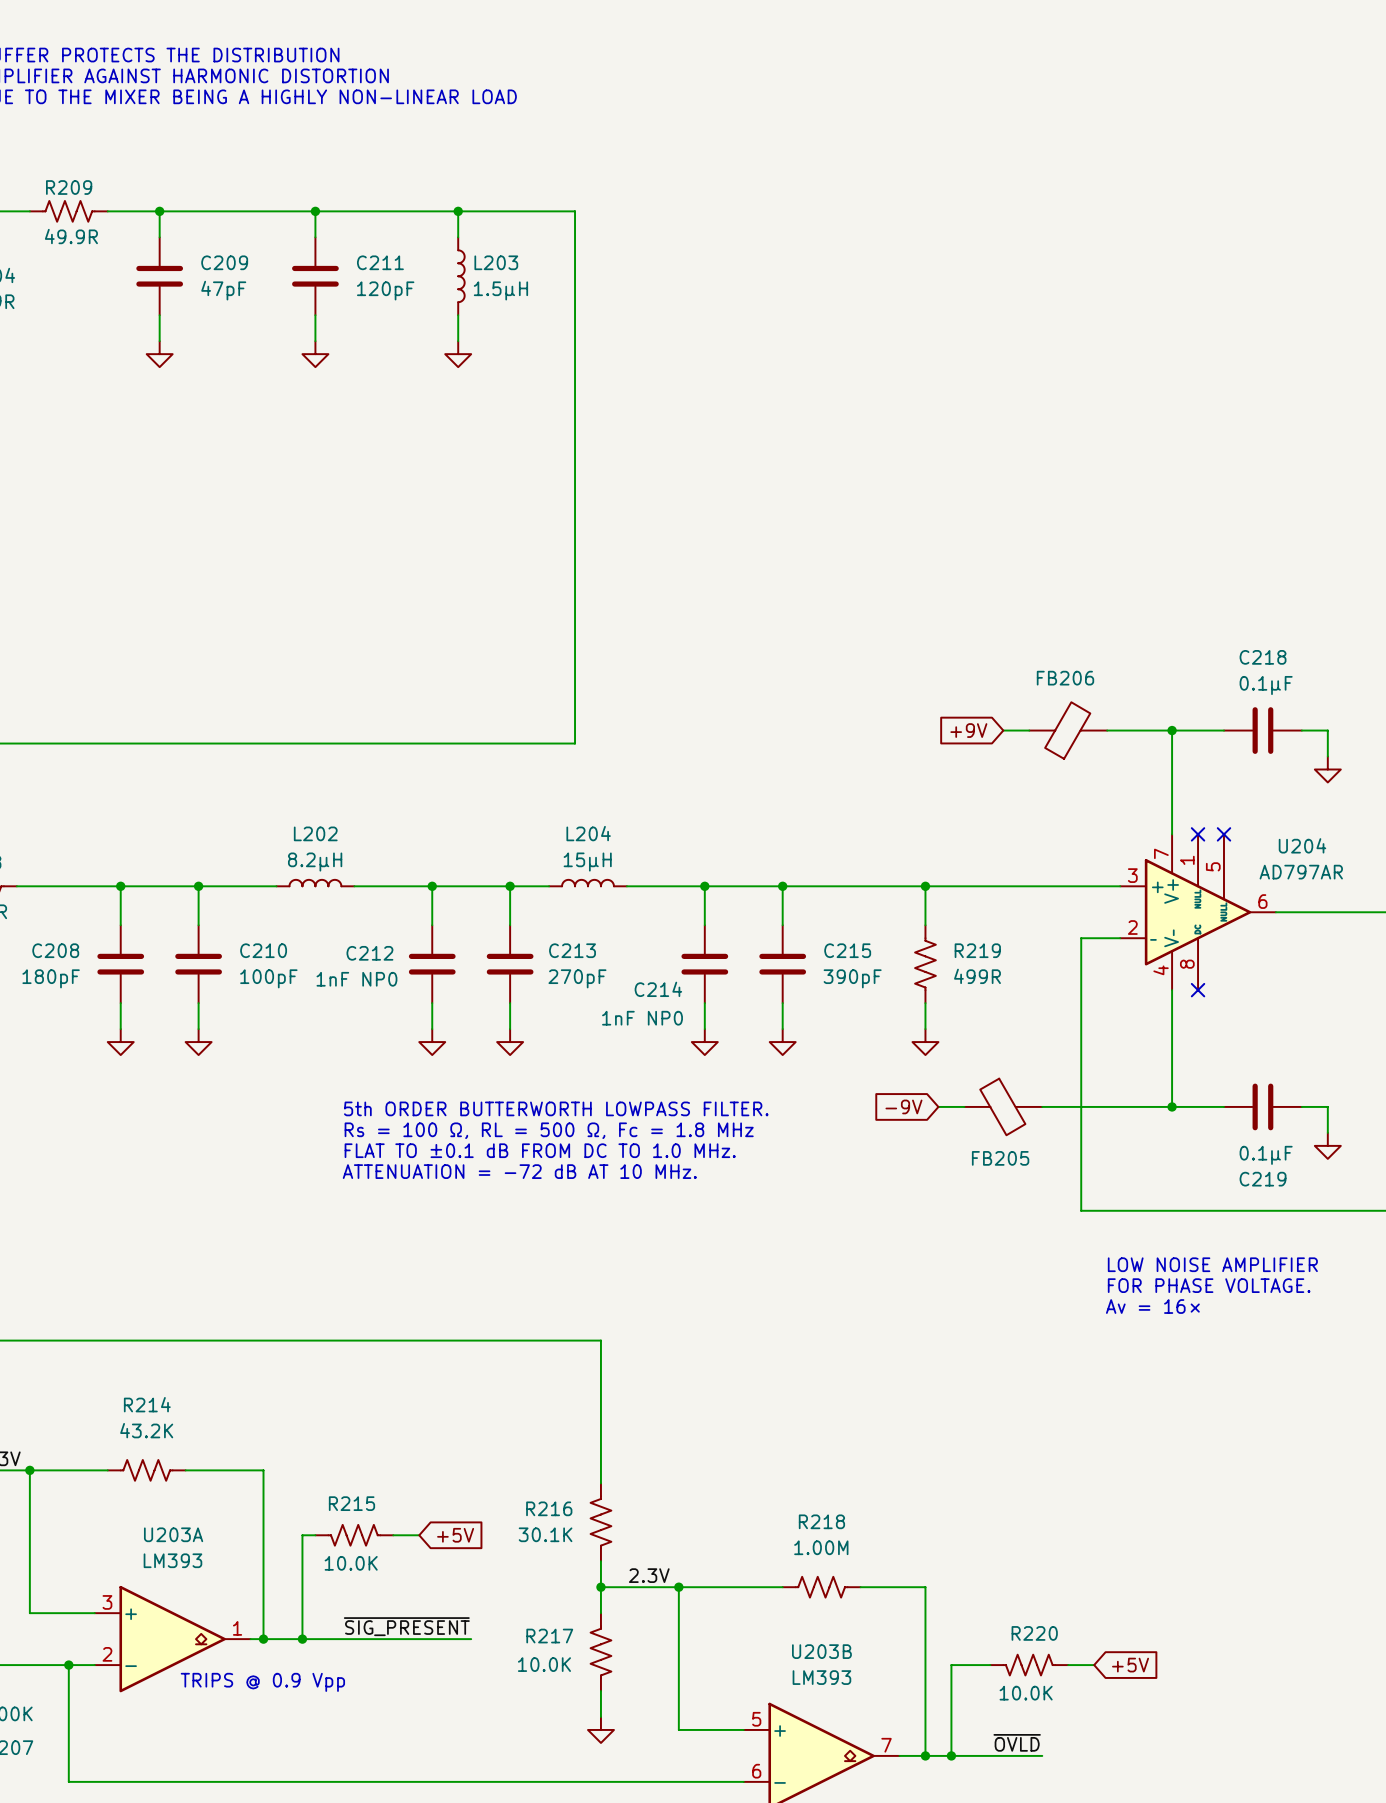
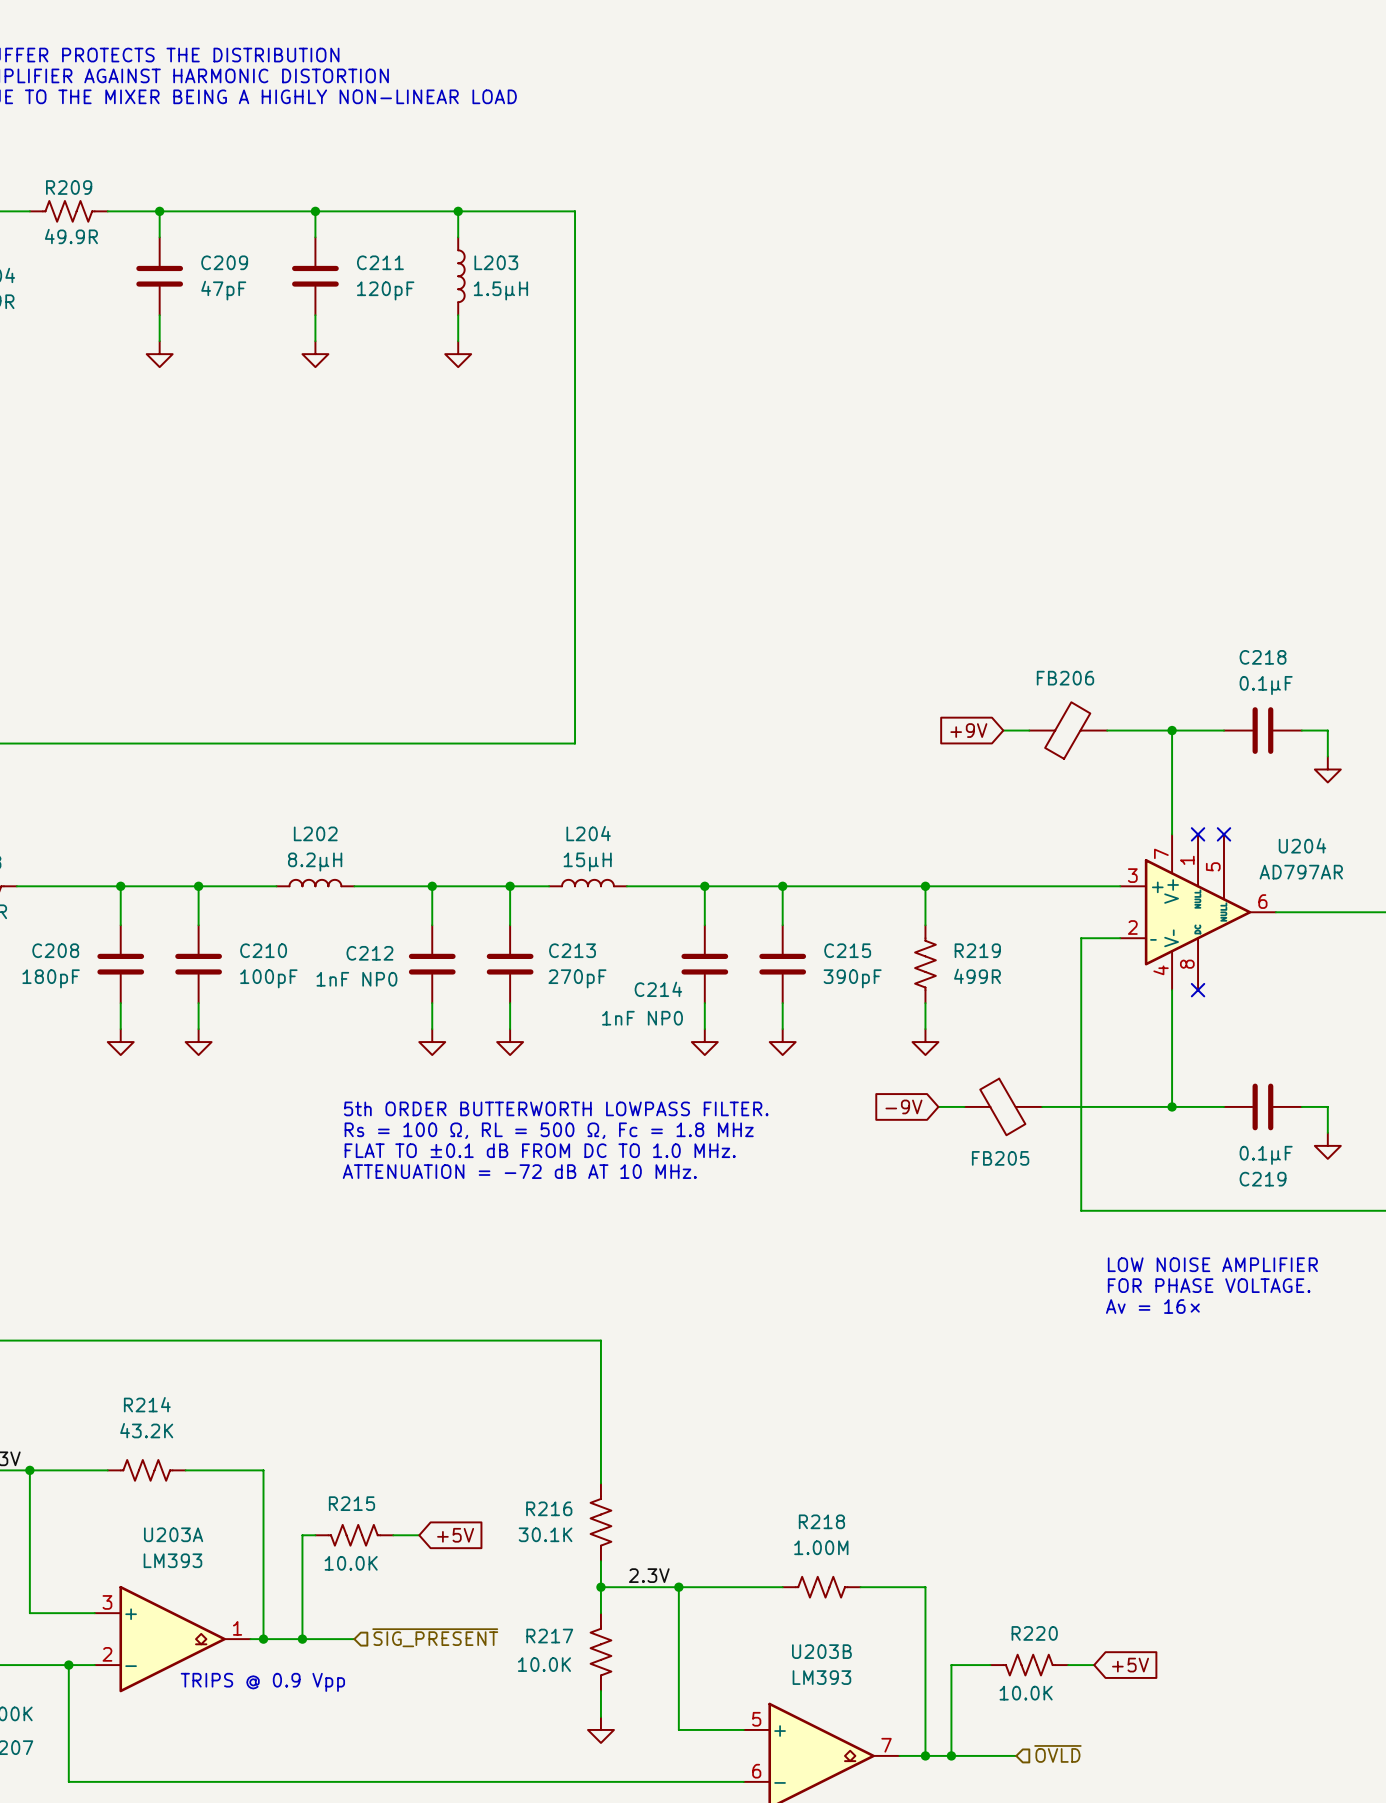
label: ~{SIG_PRESENT} (406, 1626) -> none
hierarchical label: none -> ~{SIG_PRESENT} (435, 1637)
wire: (354, 1639) (471, 1639) -> none
label: ~{OVLD} (1017, 1742) -> none
hierarchical label: none -> ~{OVLD} (1057, 1753)
wire: (1016, 1755) (1042, 1755) -> none

